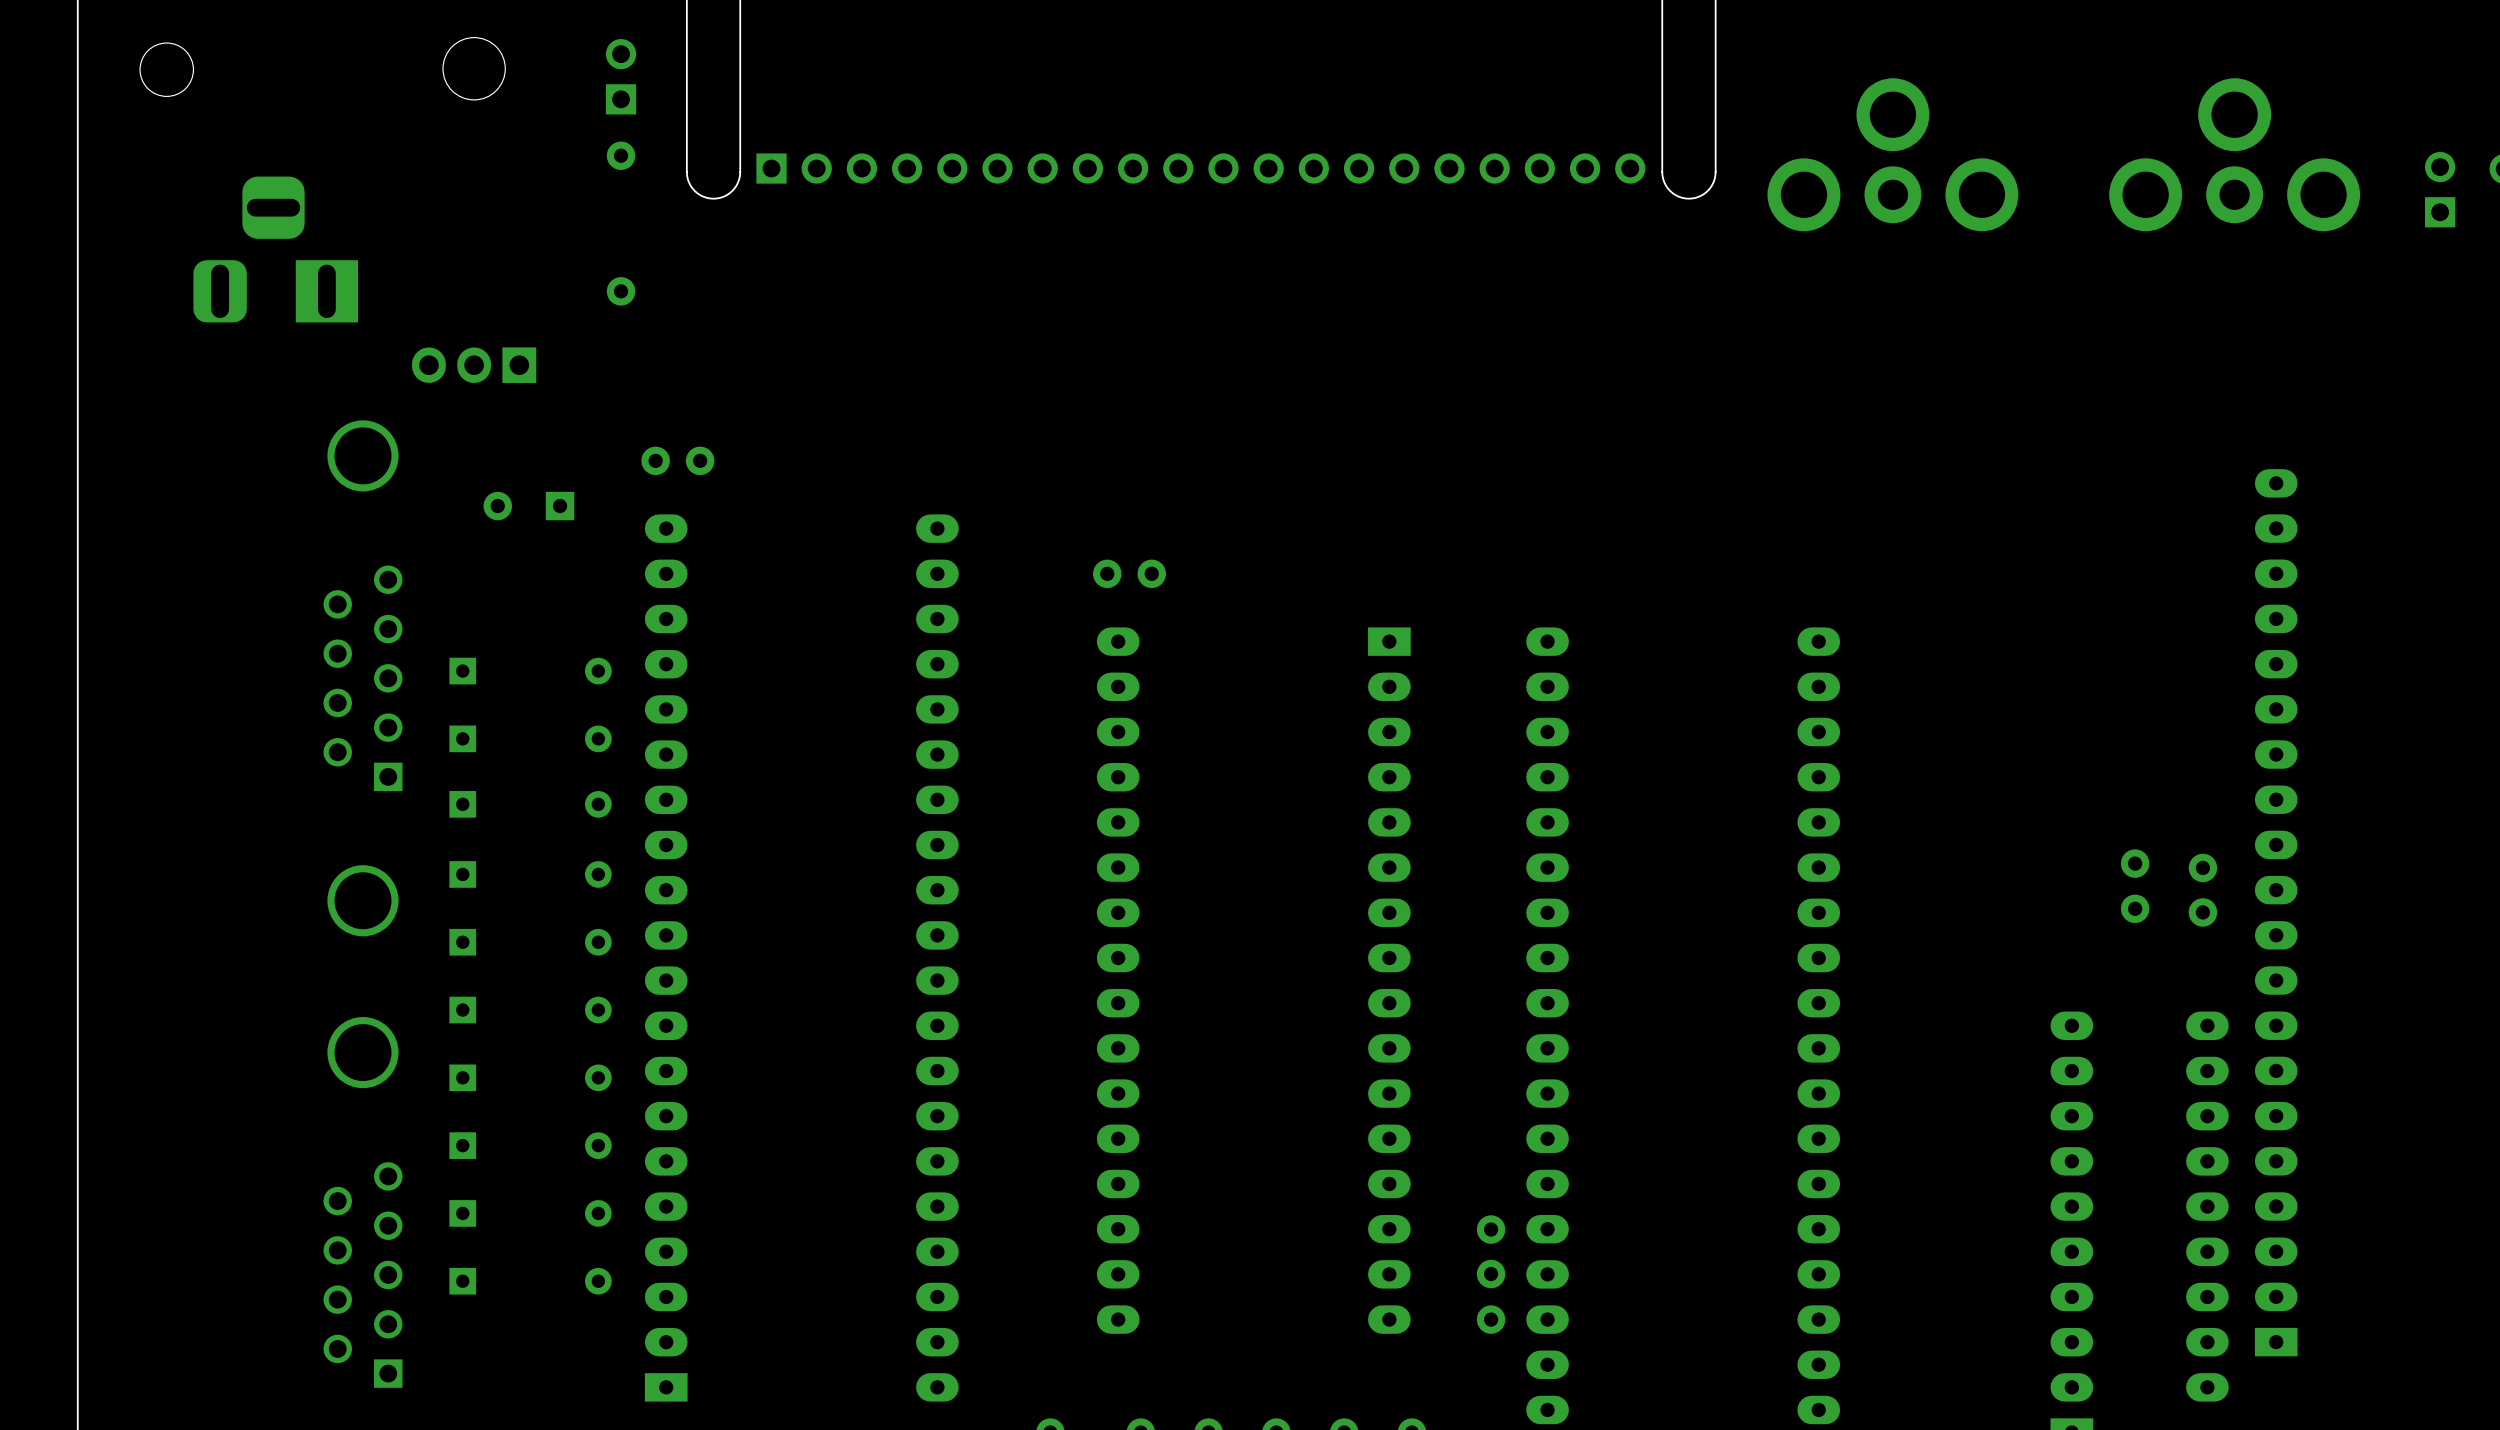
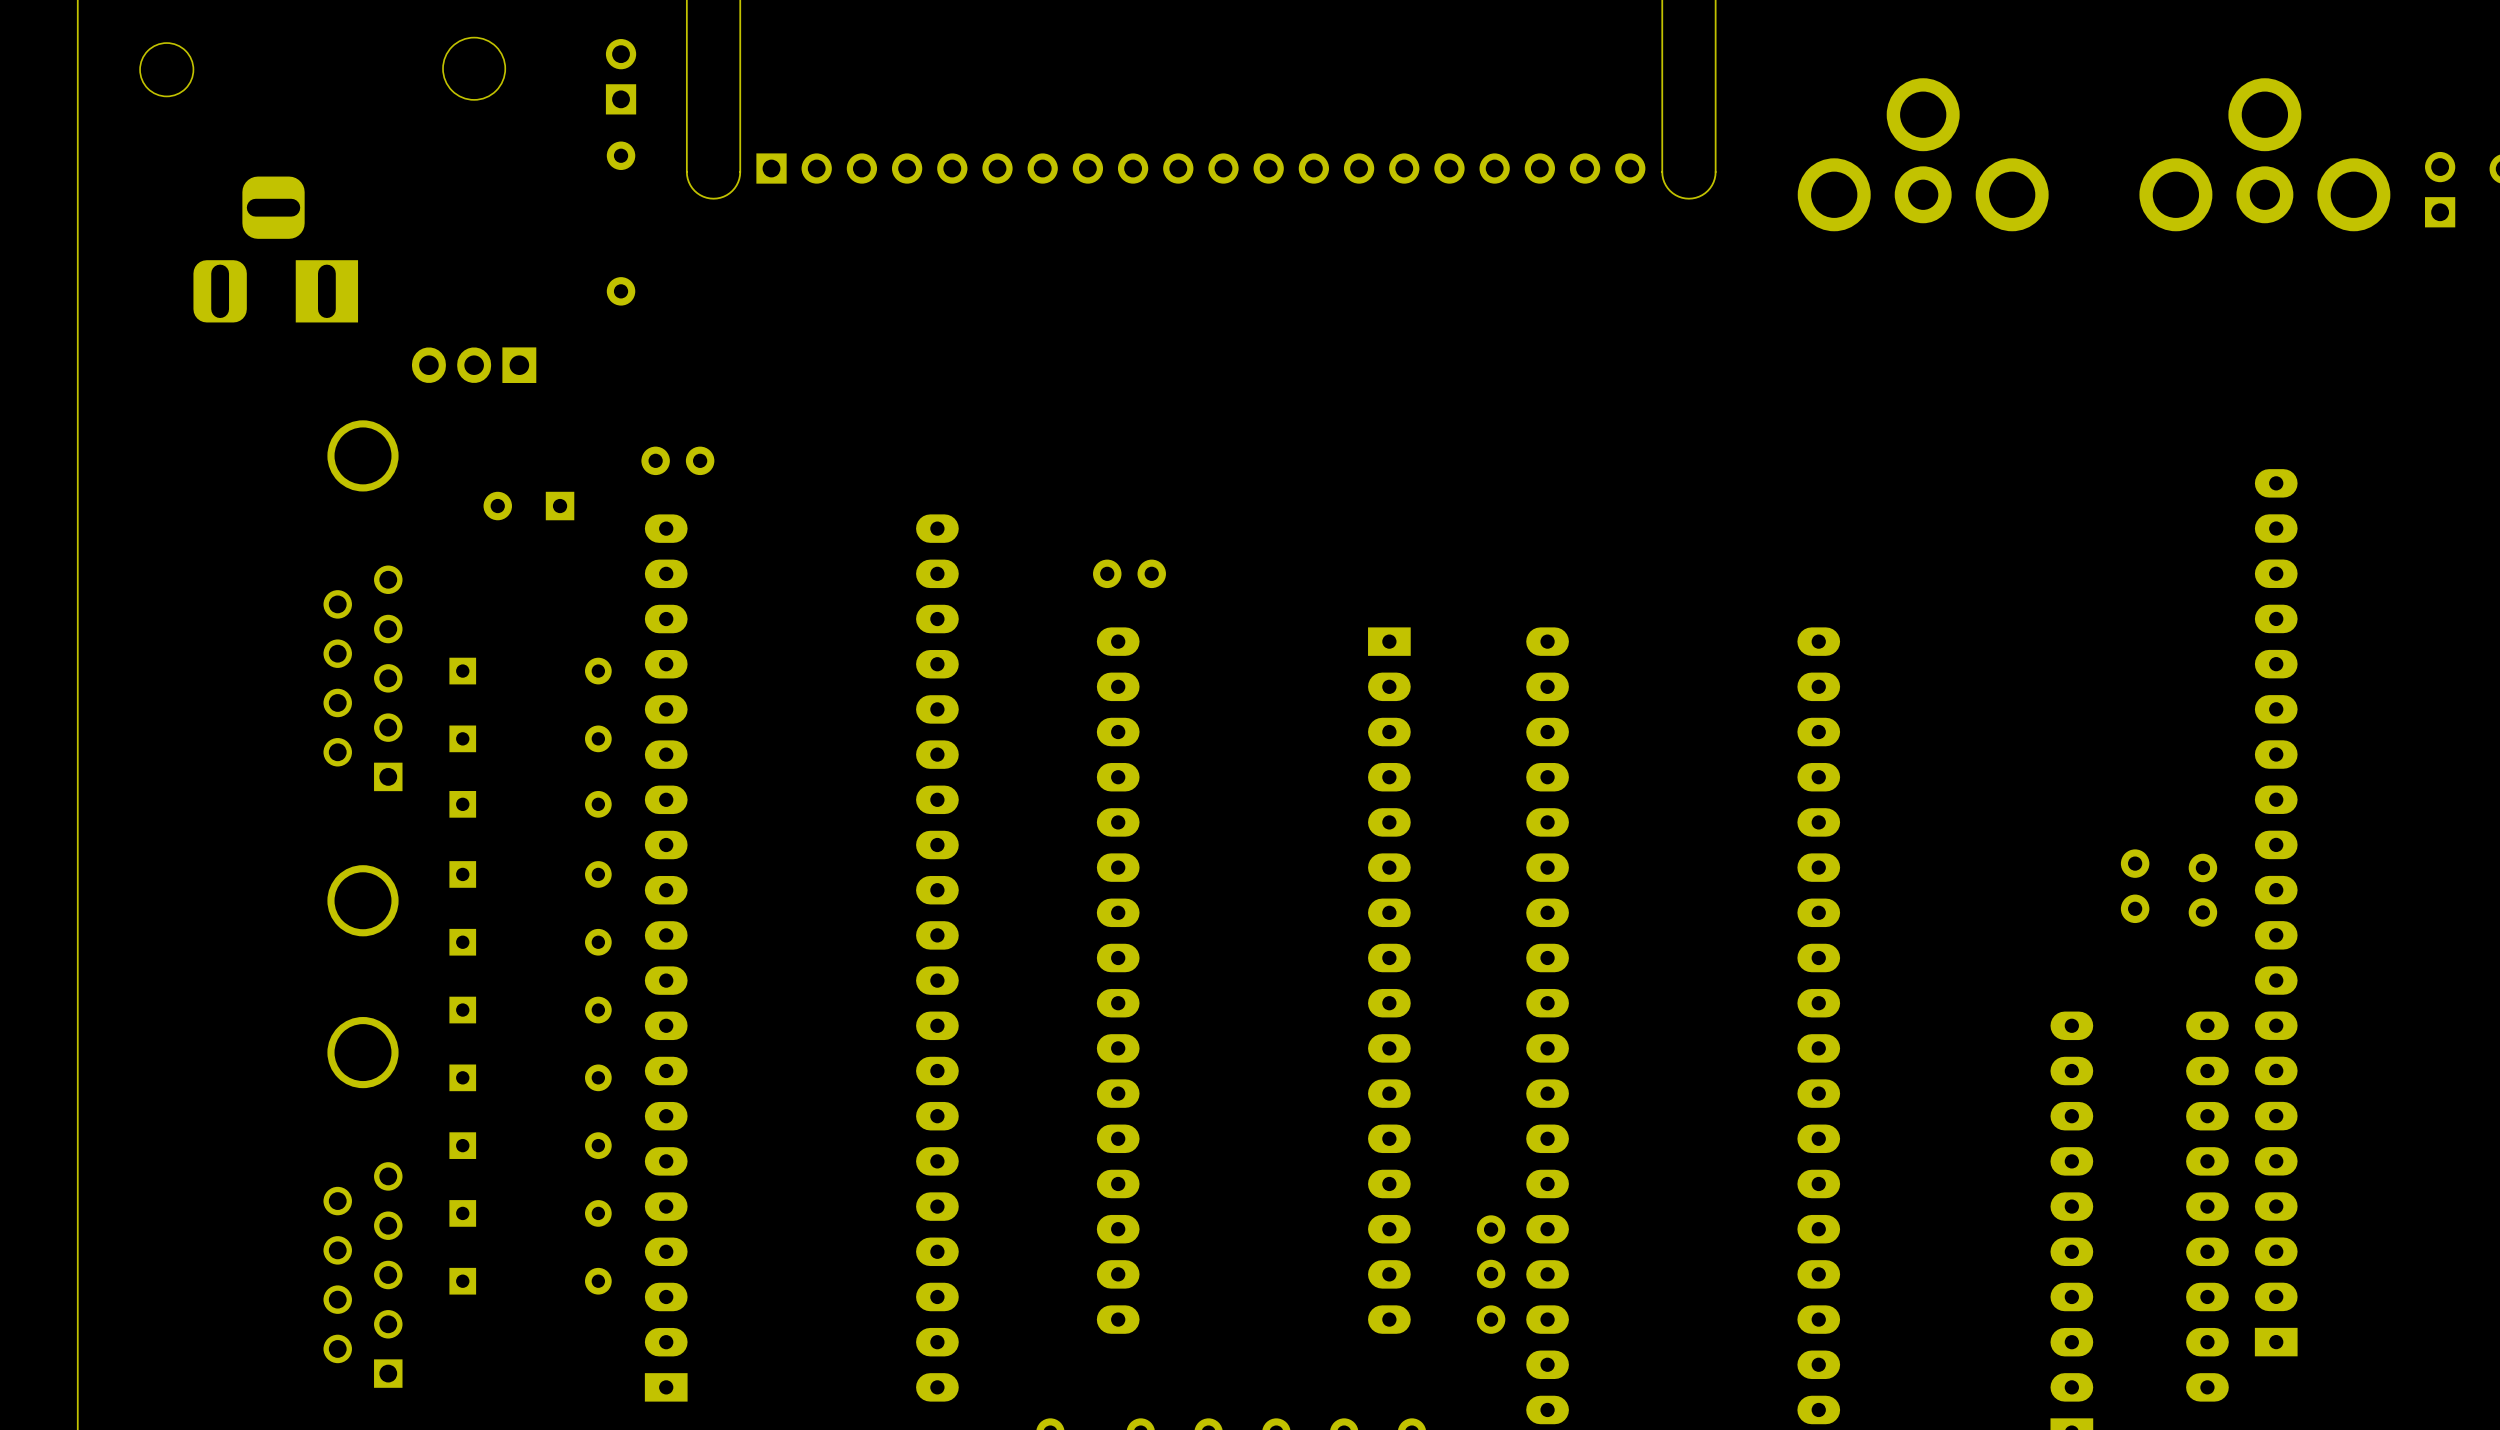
part position: (1892, 154) -> (1923, 154)
part position: (2234, 154) -> (2264, 154)

